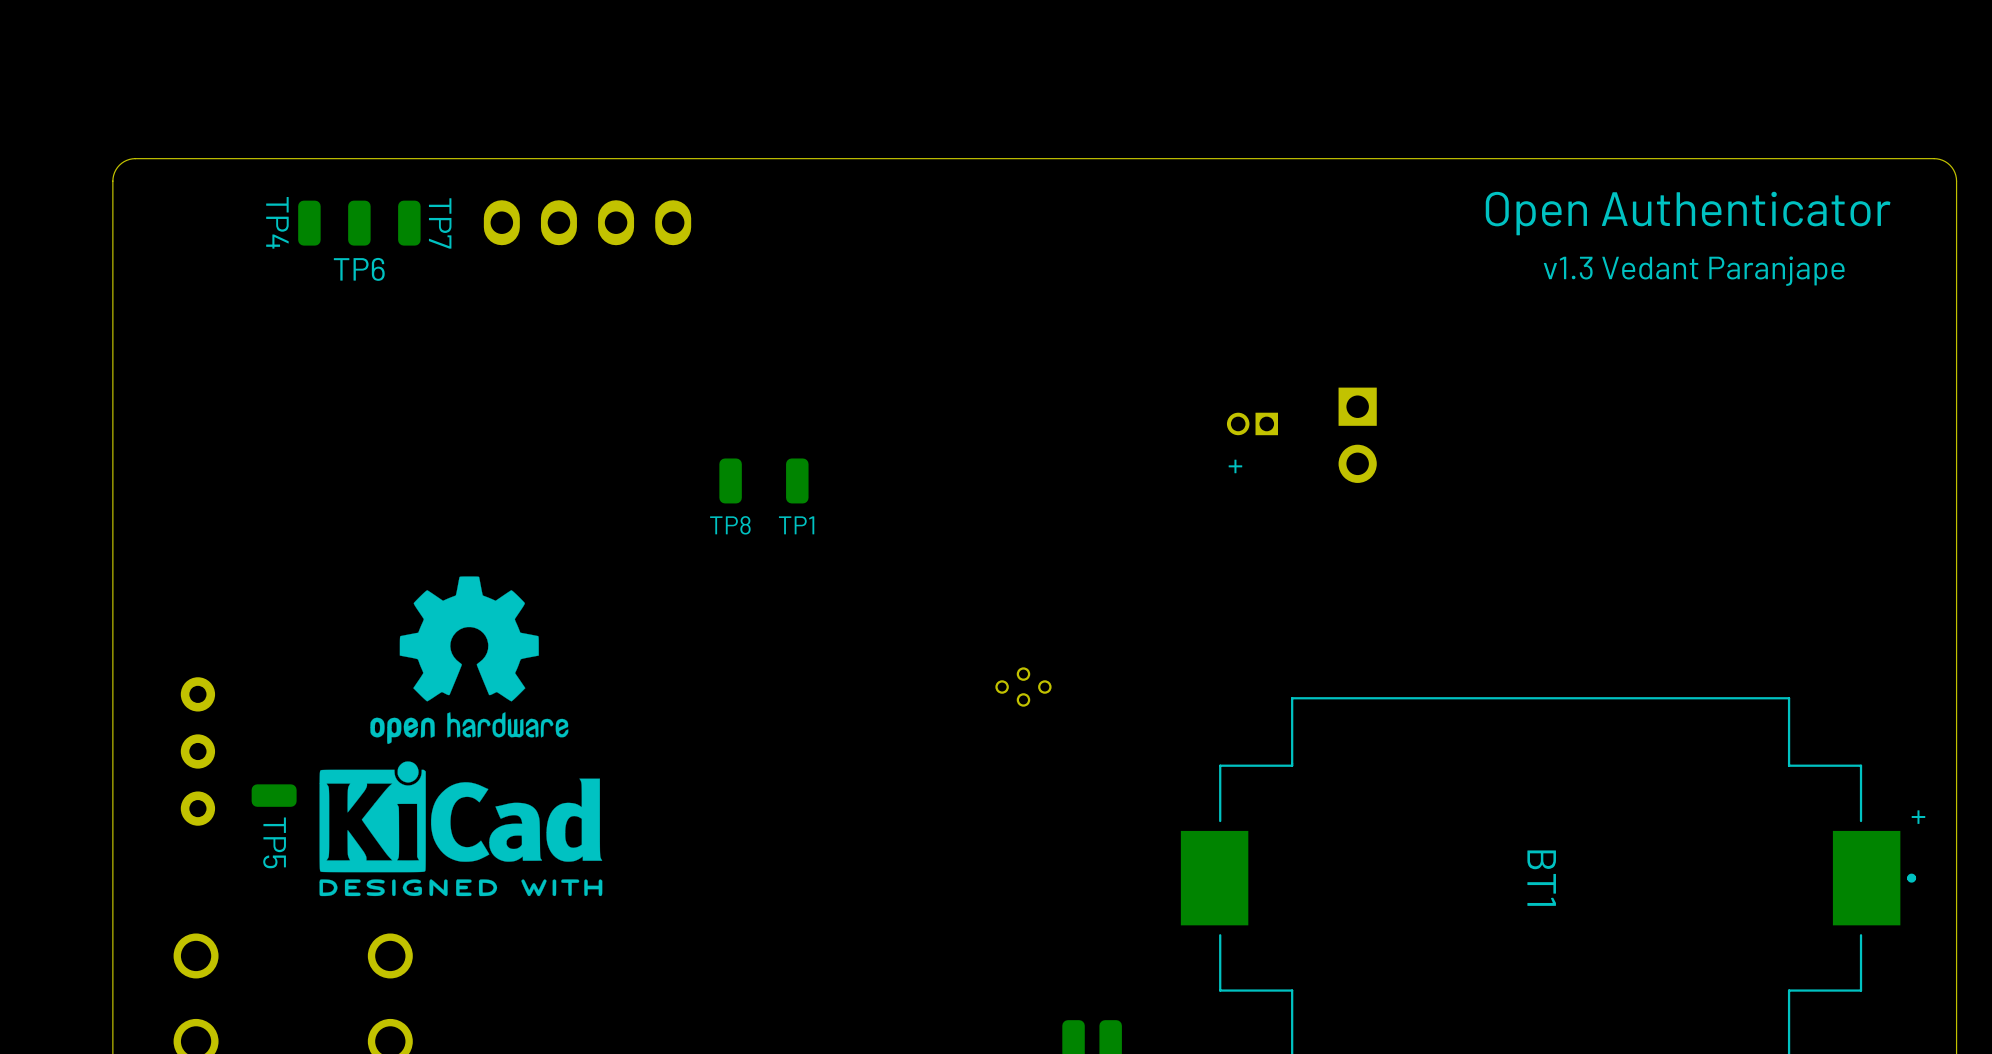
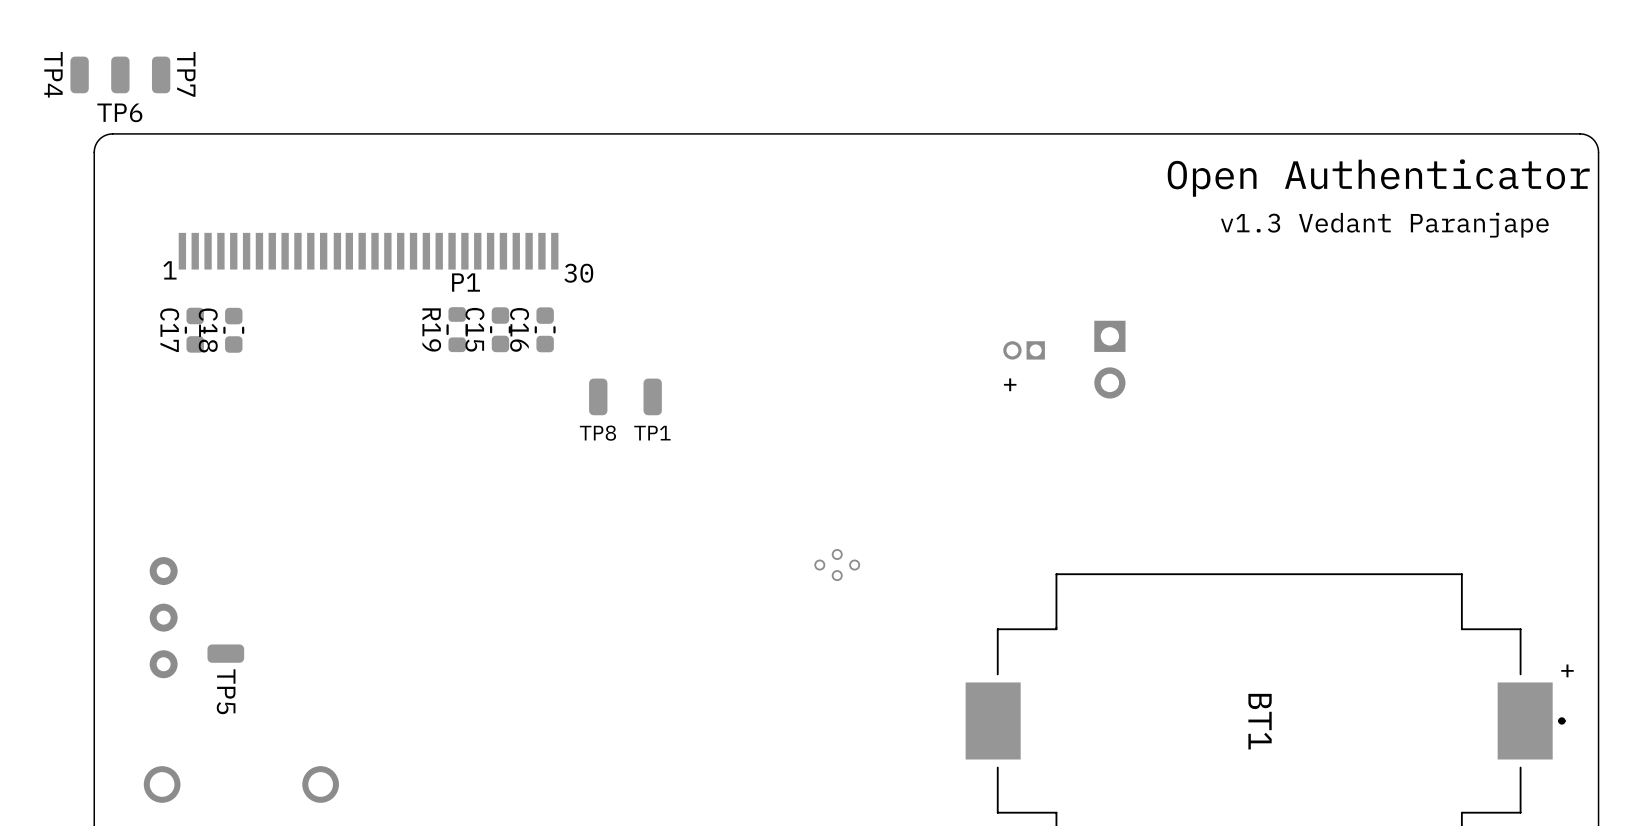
part: (587, 222) -> none
TP4 position: (309, 223) -> (79, 74)
TP6 position: (359, 223) -> (120, 74)
TP7 position: (409, 223) -> (161, 74)
P1: none -> (368, 251)
R19: none -> (457, 329)
C15: none -> (500, 329)
C16: none -> (545, 329)
C17: none -> (195, 330)
C18: none -> (233, 330)
drawing: [319, 576, 603, 897] -> none

